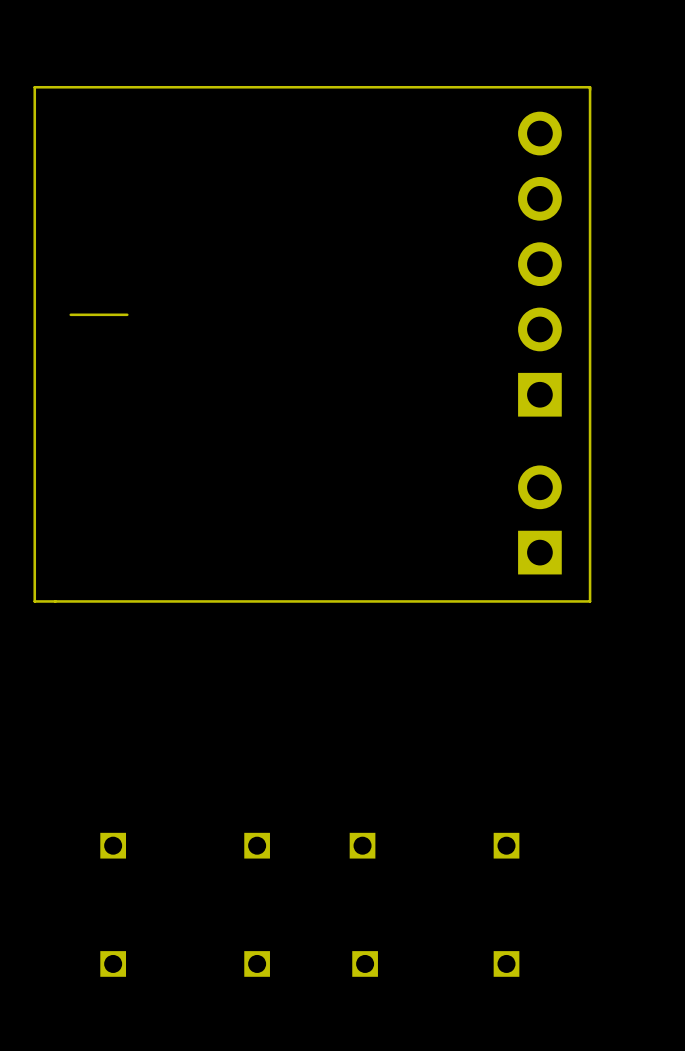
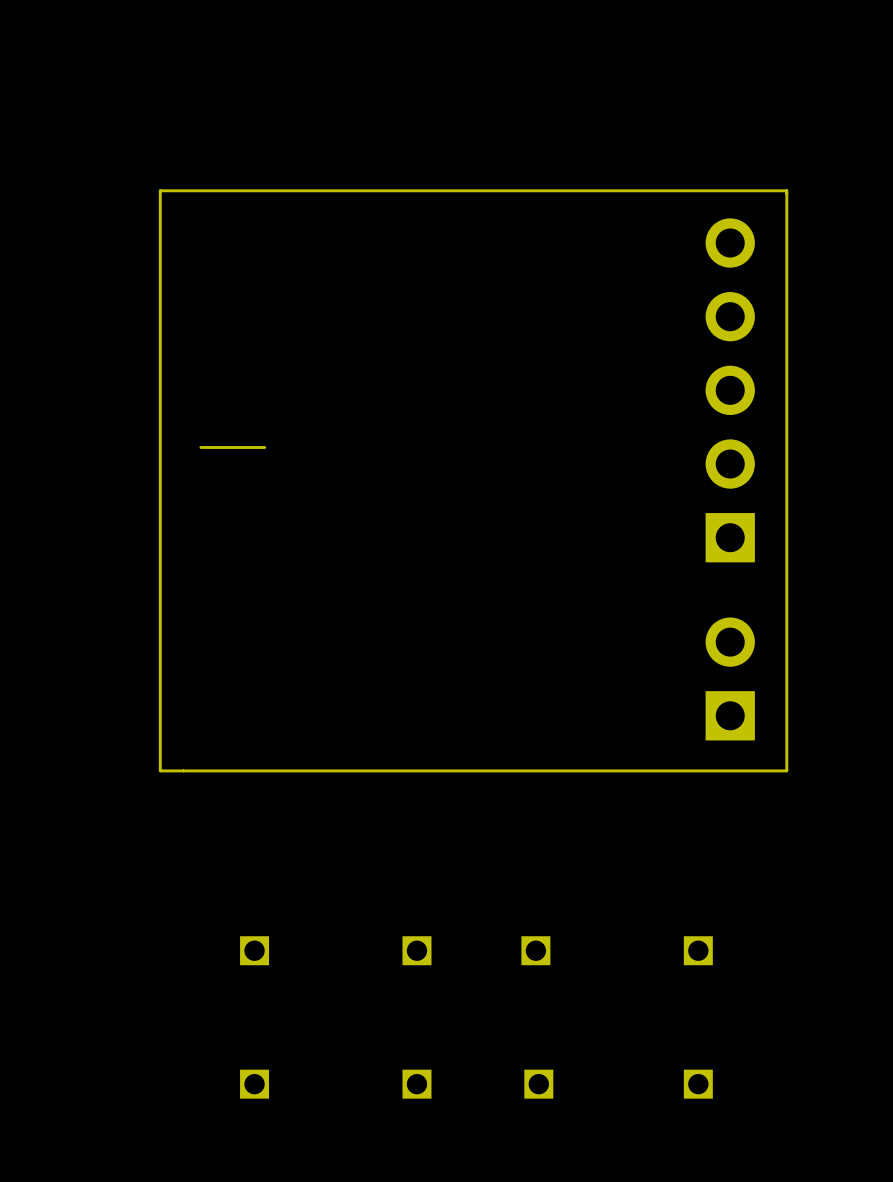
board edge: (590, 87) (590, 601) (34, 601) (34, 87) (590, 87) -> (786, 190) (786, 770) (160, 770) (160, 190) (786, 190)
part position: (539, 264) -> (730, 390)
board edge: (127, 314) (70, 314) -> (264, 447) (200, 447)
part position: (539, 519) -> (730, 678)

